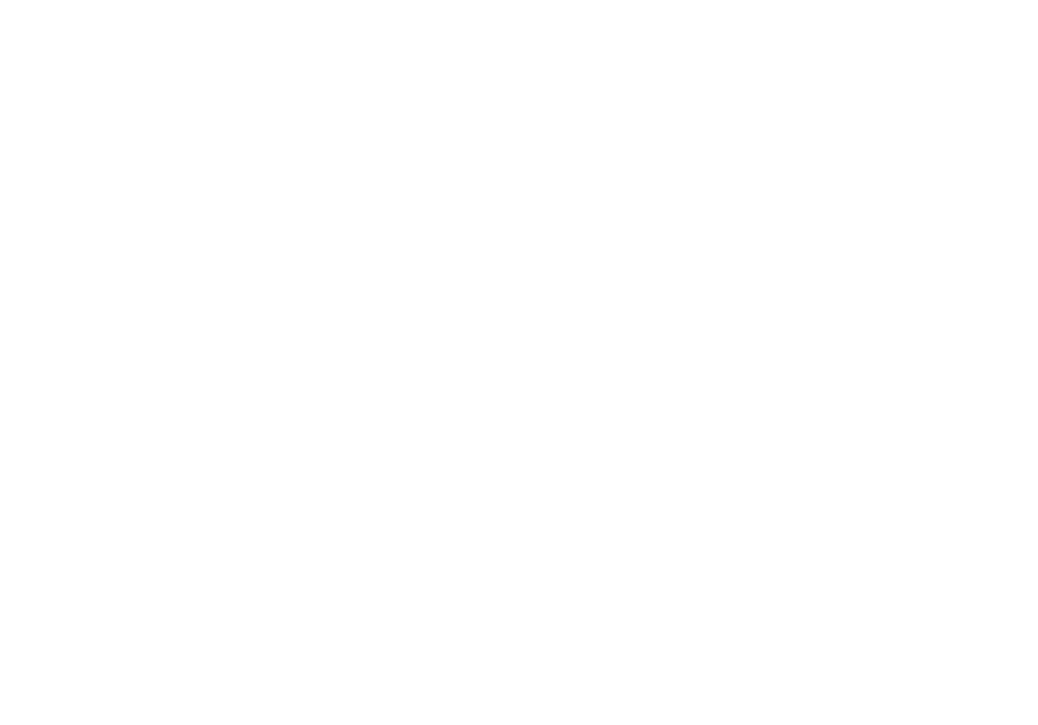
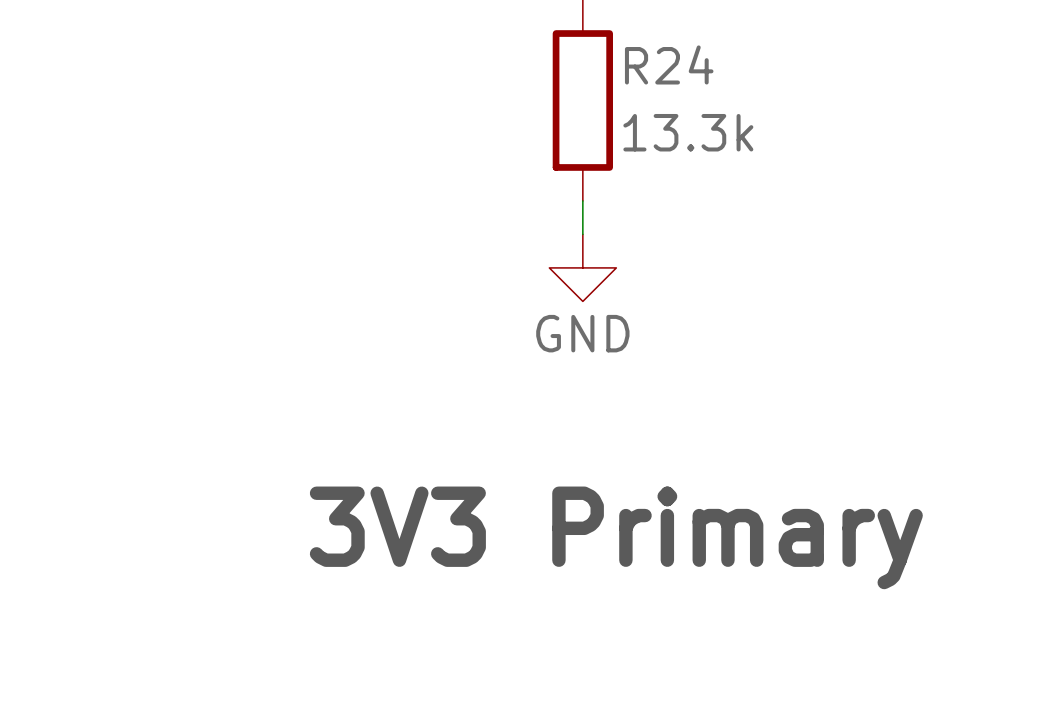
R24: none -> 13.3k (582, 100)
wire: none -> (582, 200) (582, 234)
power symbol: none -> GND (582, 267)
text: none -> 3V3 Primary (616, 537)

